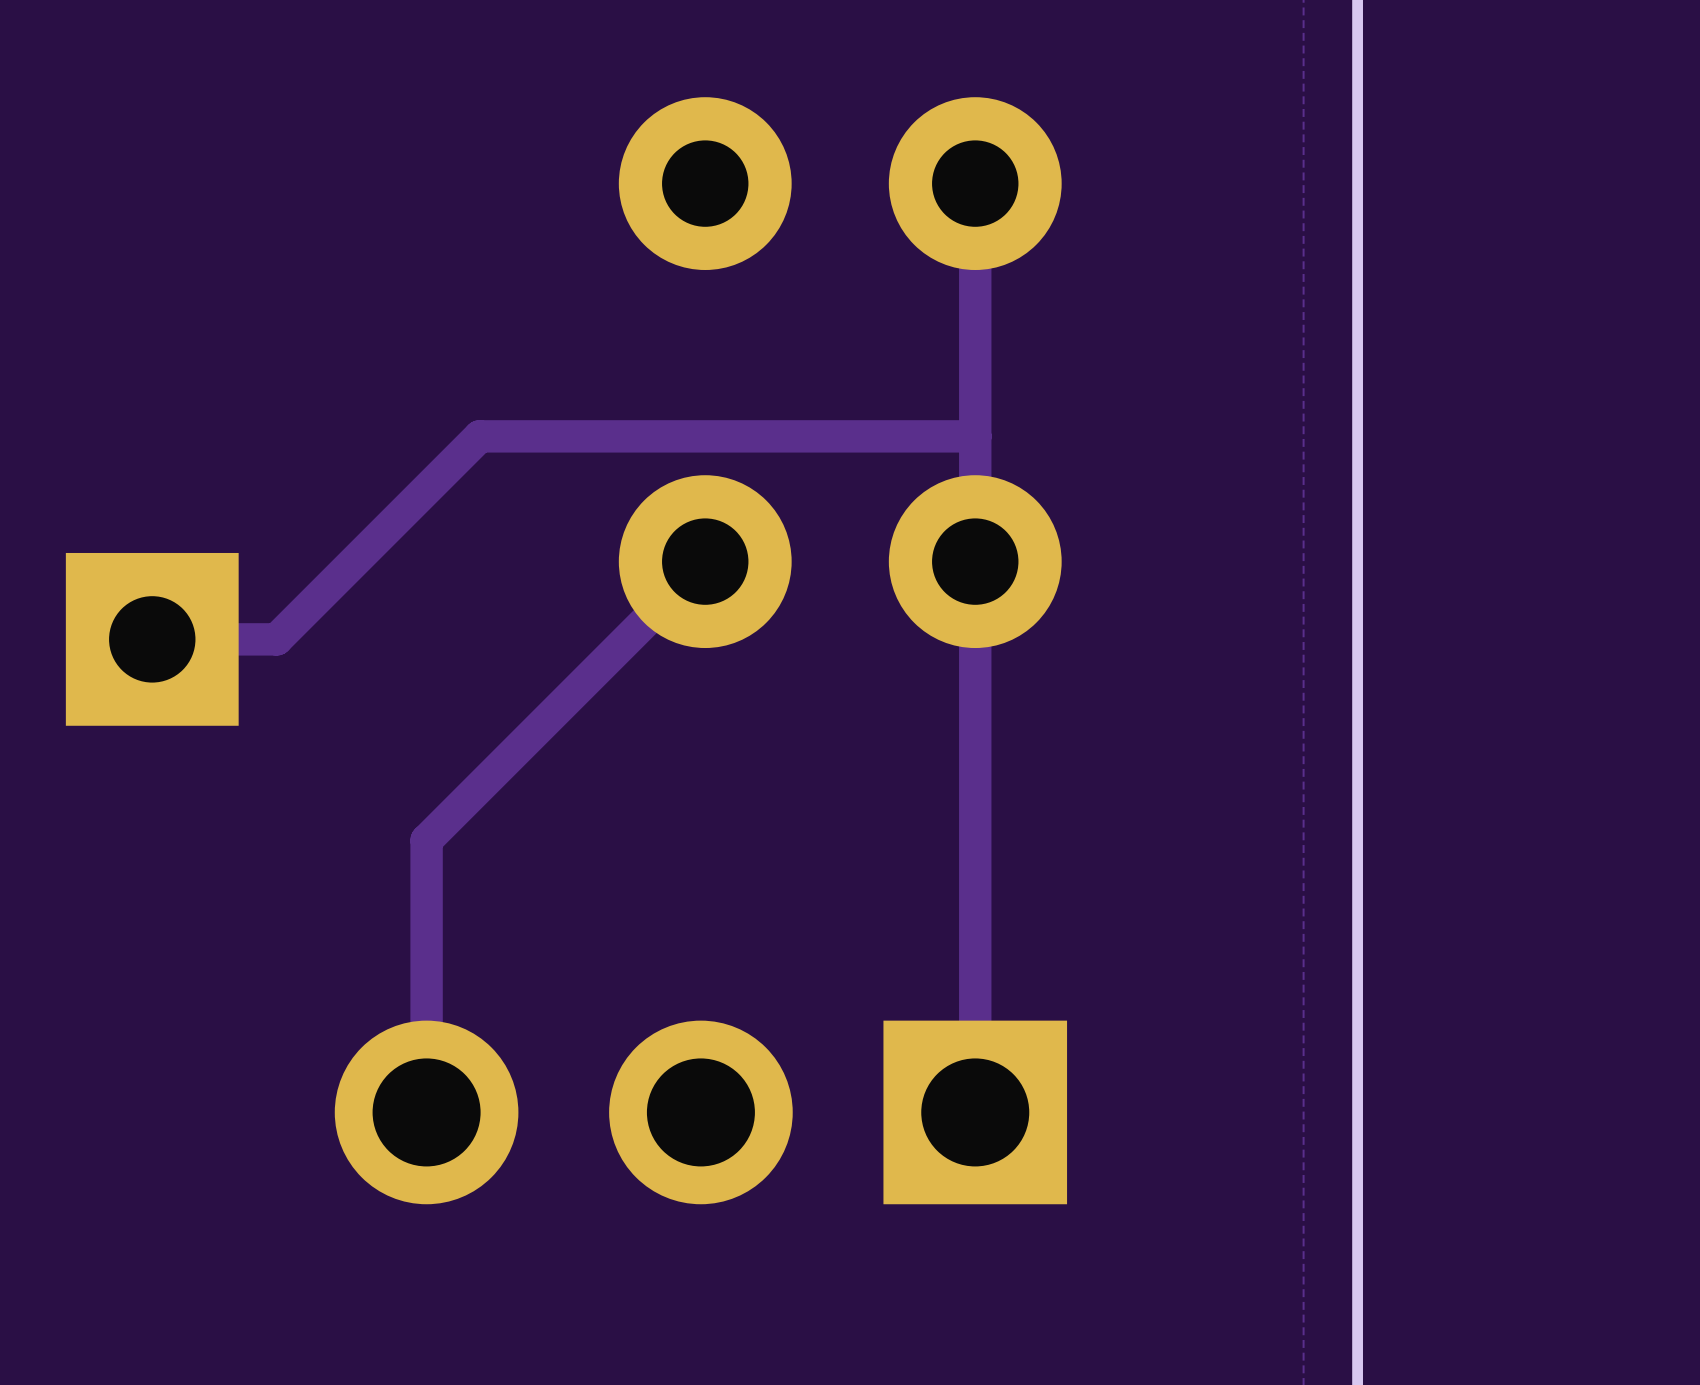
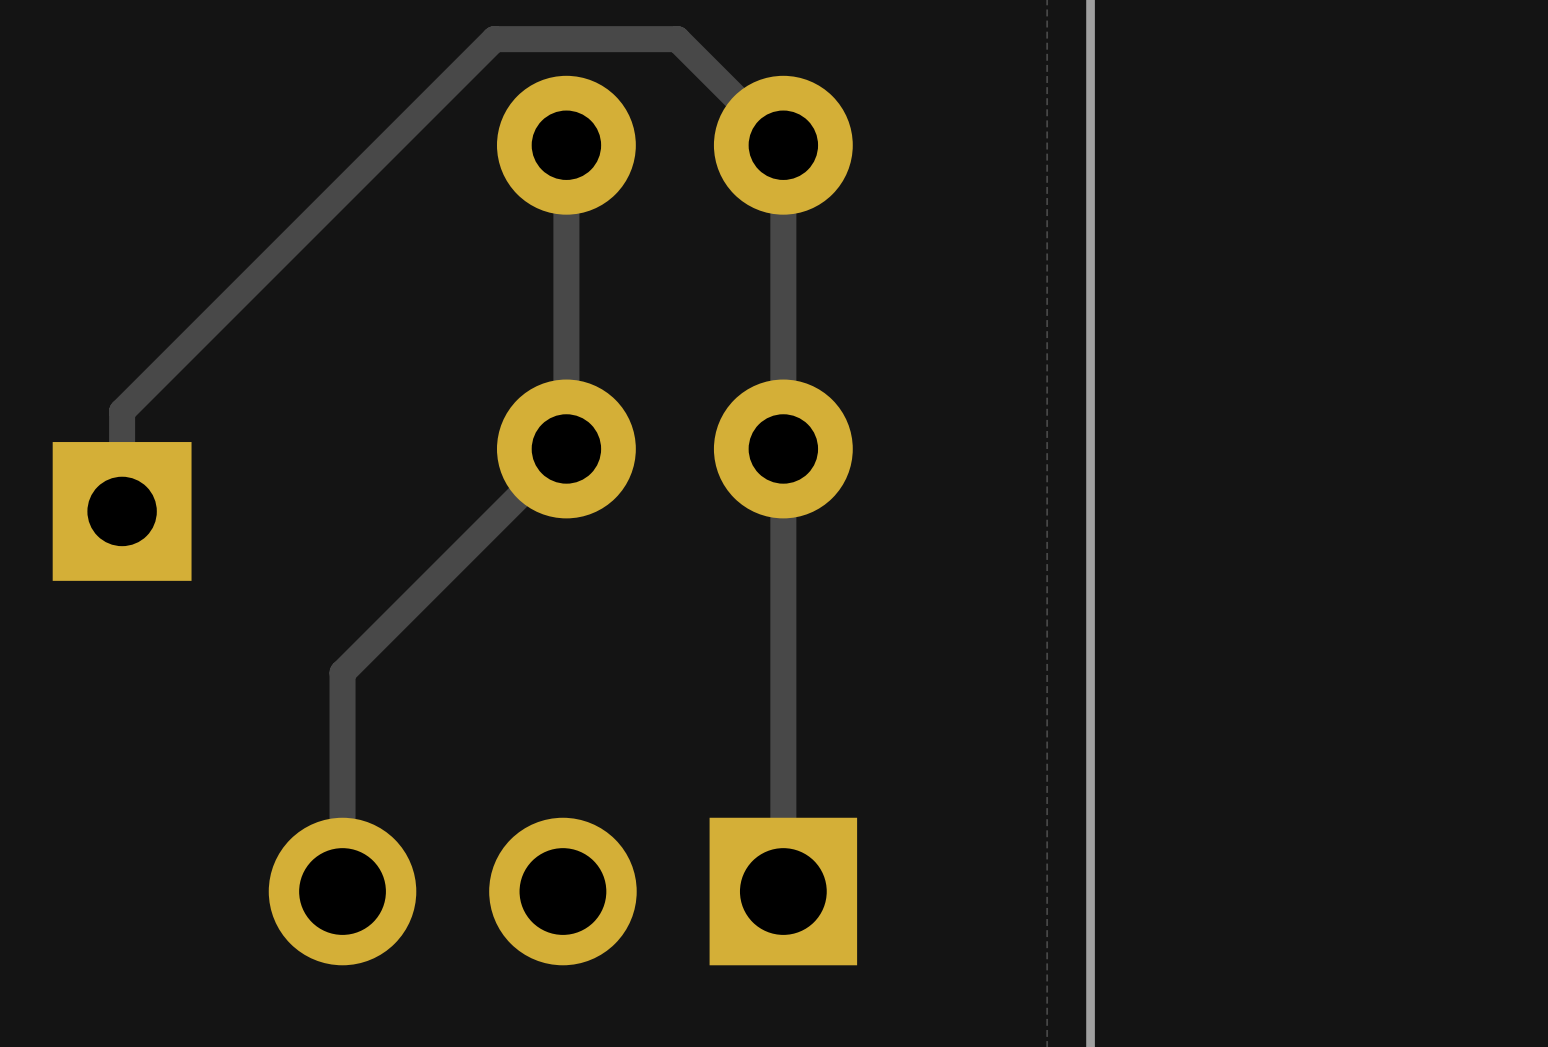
track: none -> (566, 145) (566, 448)
track: (975, 436) (479, 436) (276, 639) (152, 639) -> (783, 145) (677, 39) (494, 39) (122, 411) (122, 511)

